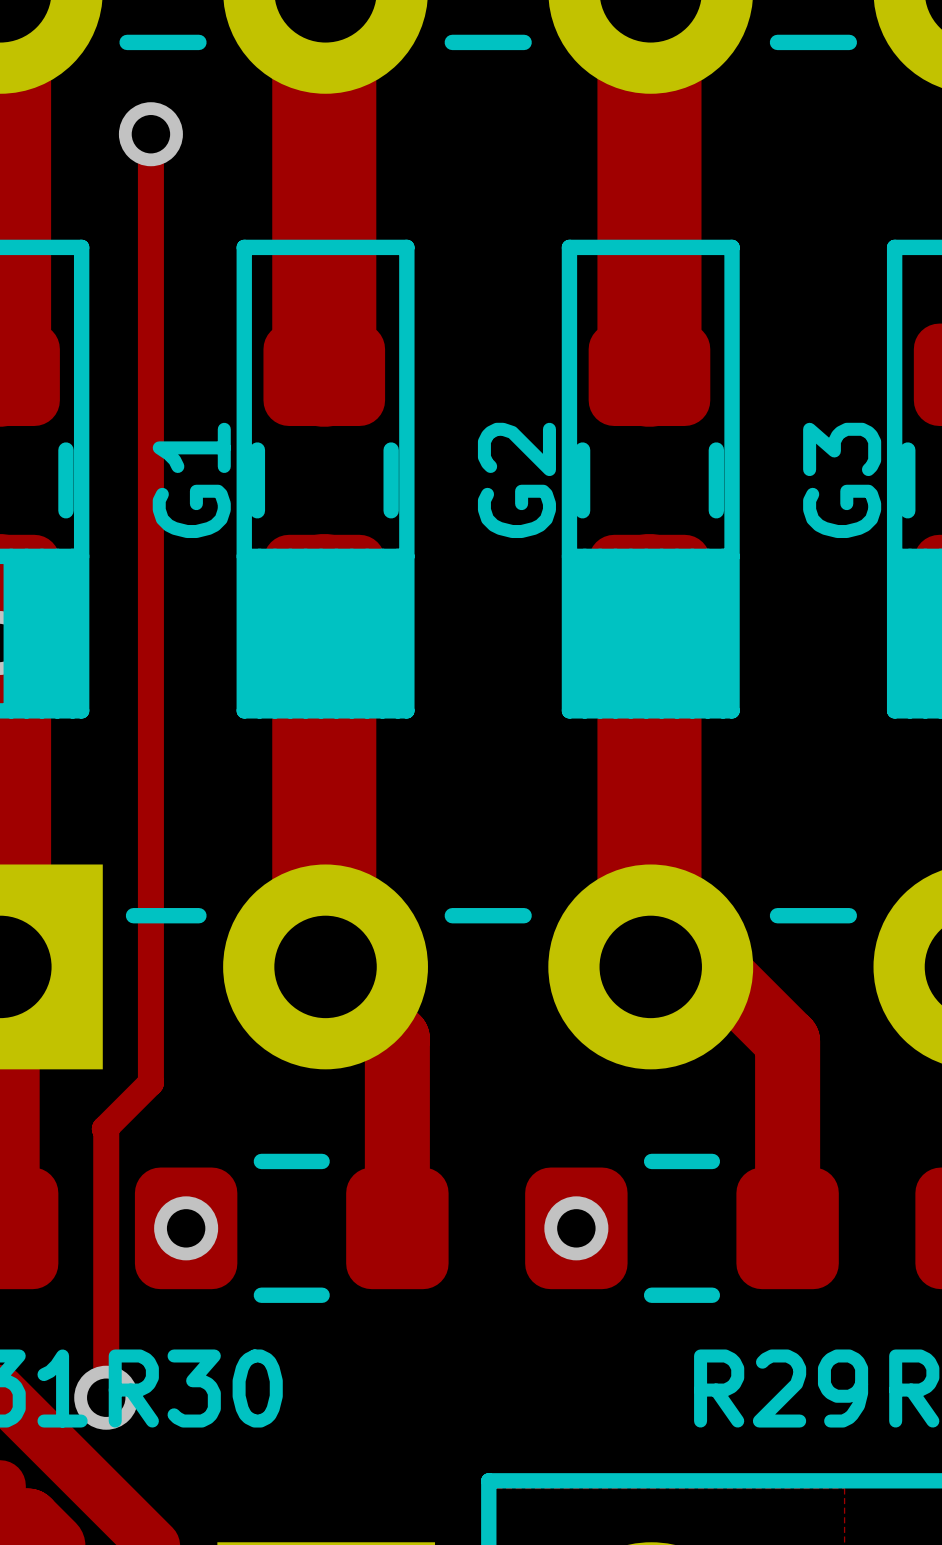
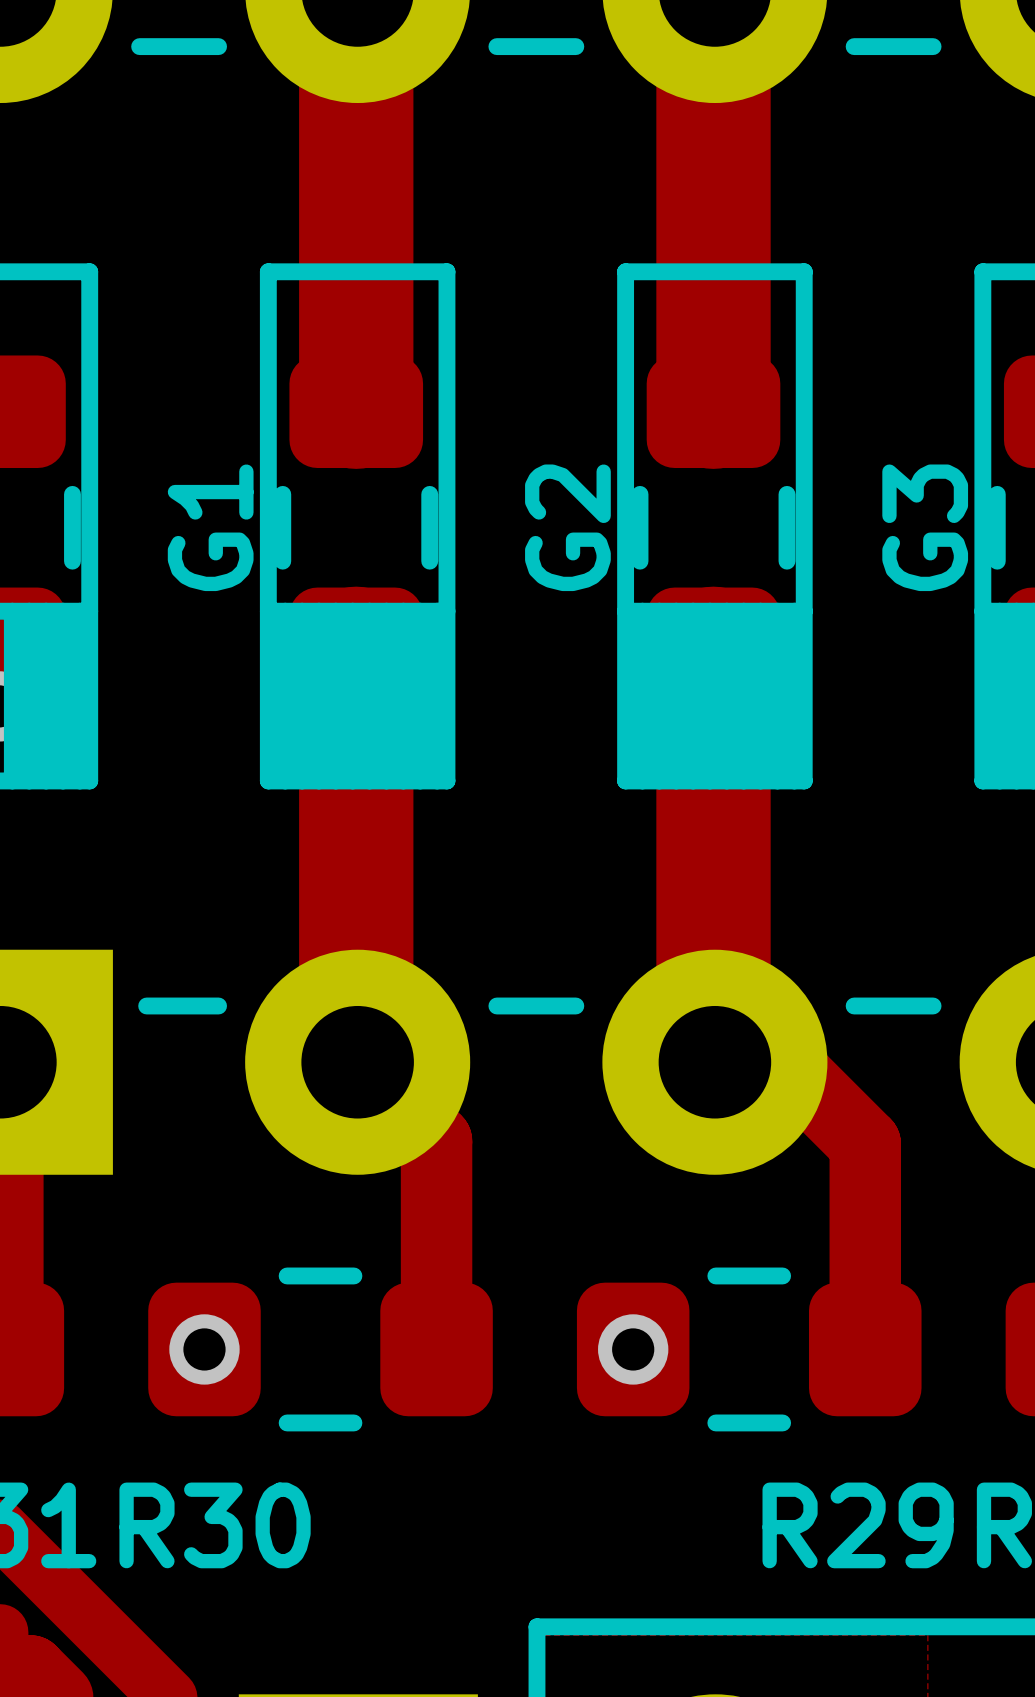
track: (150, 134) (150, 1082) (104, 1128) -> none
via: (150, 134) -> none
track: (106, 1130) (106, 1397) -> none
via: (106, 1397) -> none

